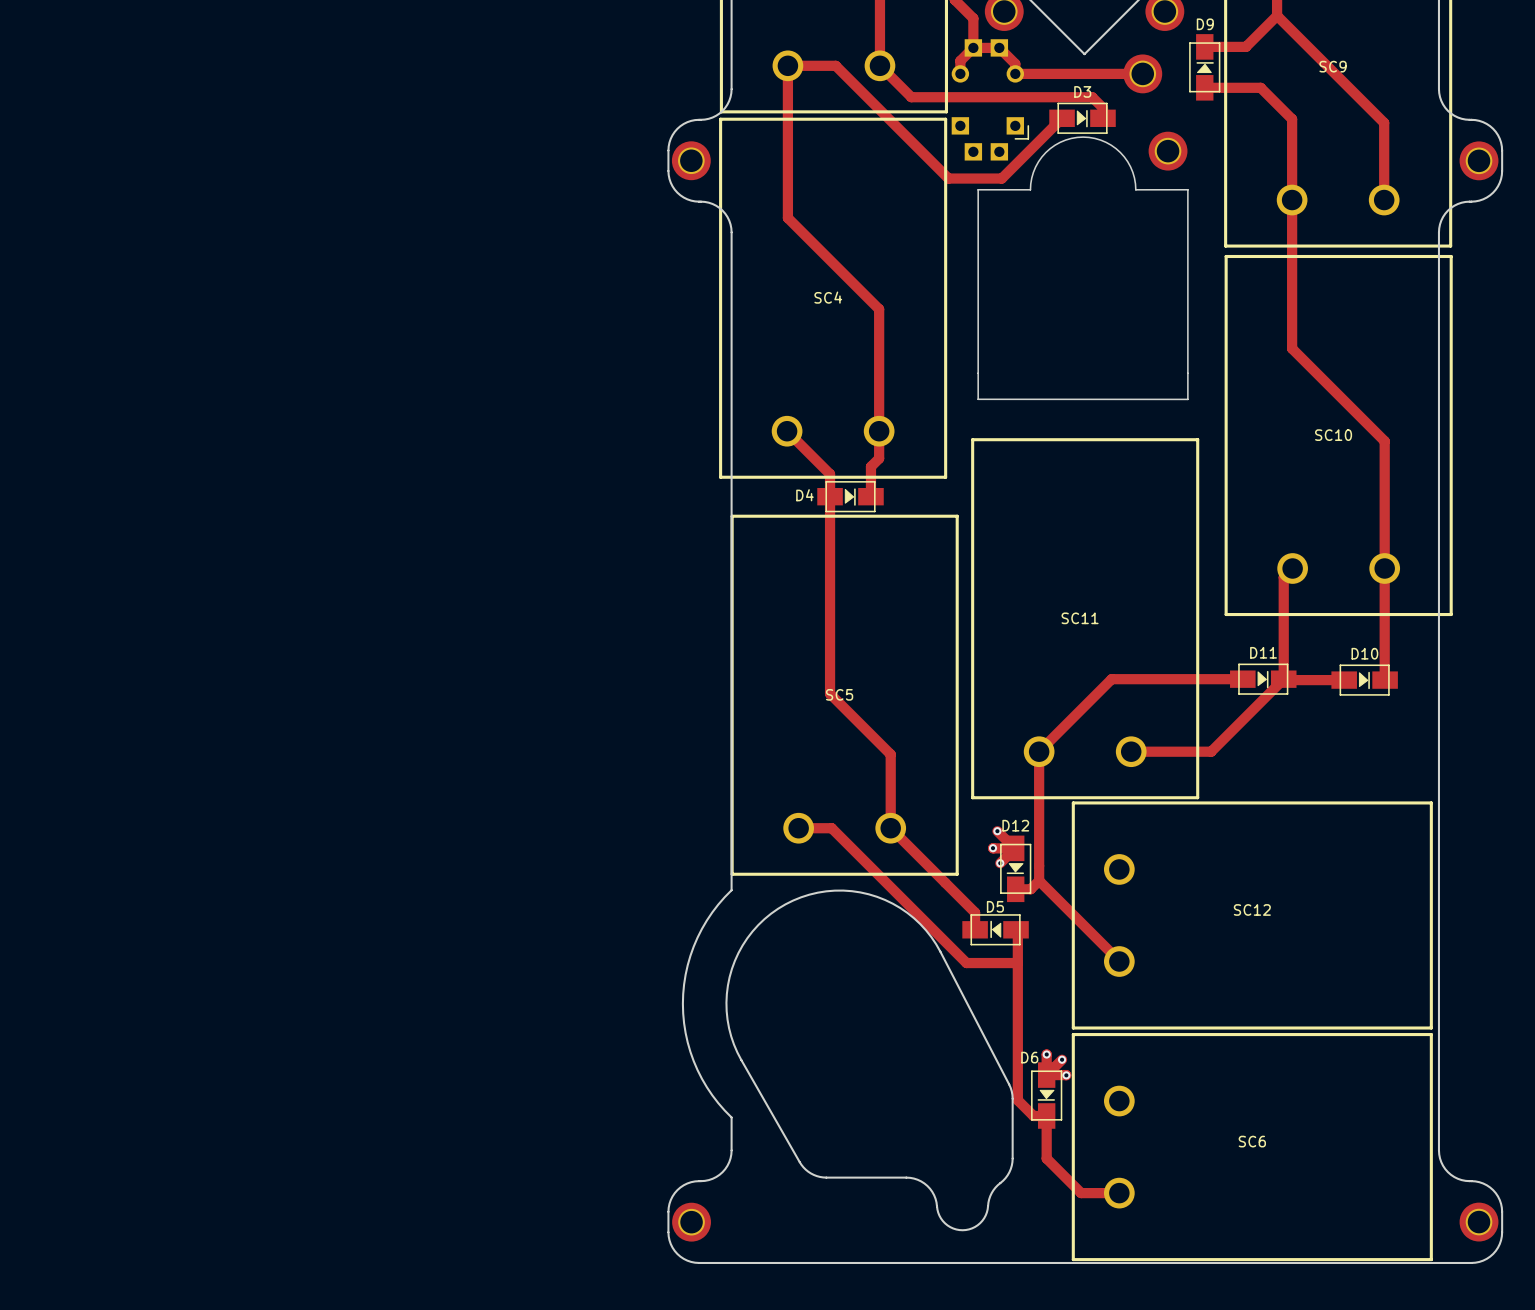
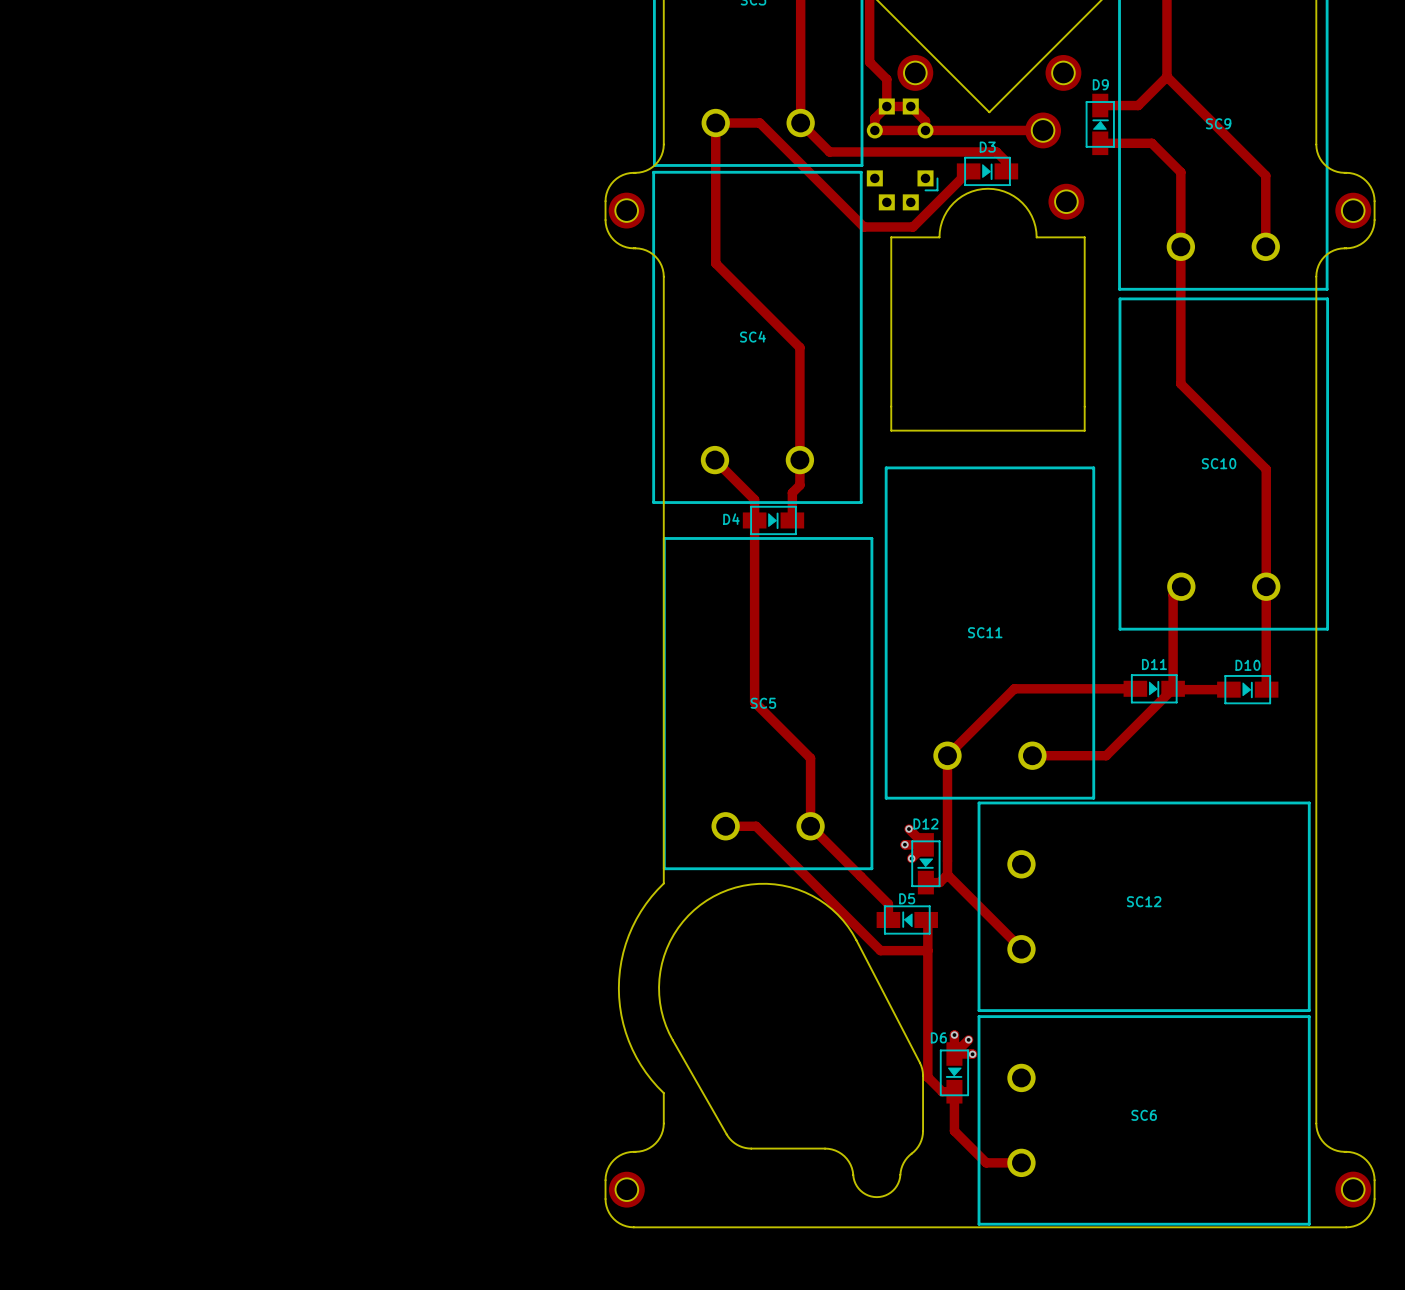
track: none -> (874, 130) (925, 130)

